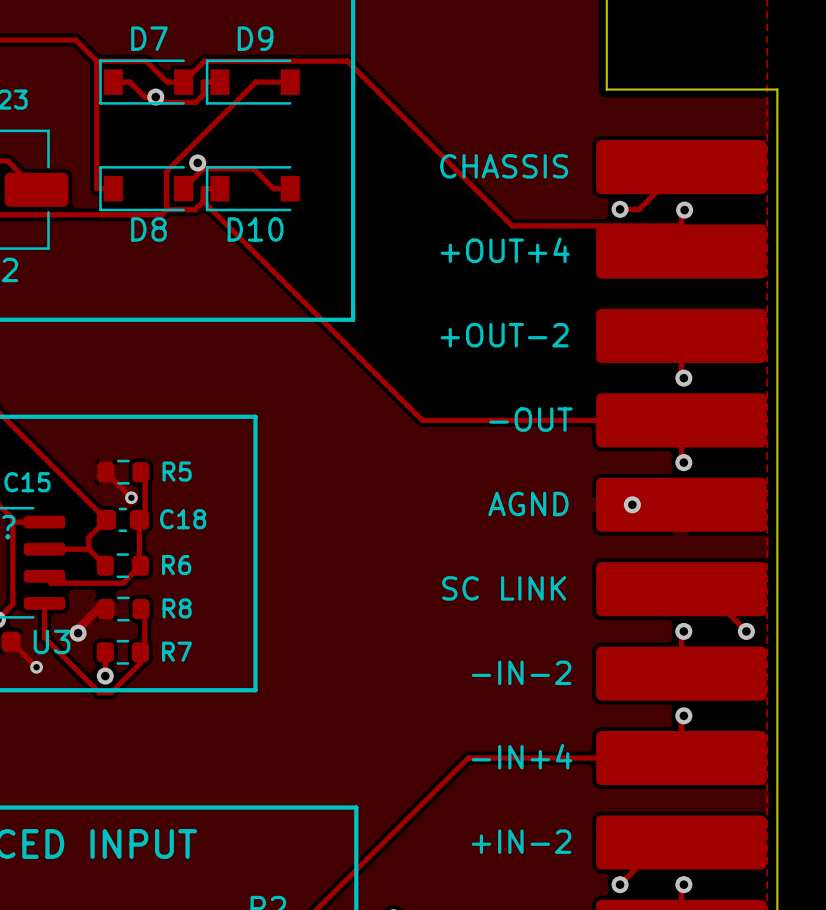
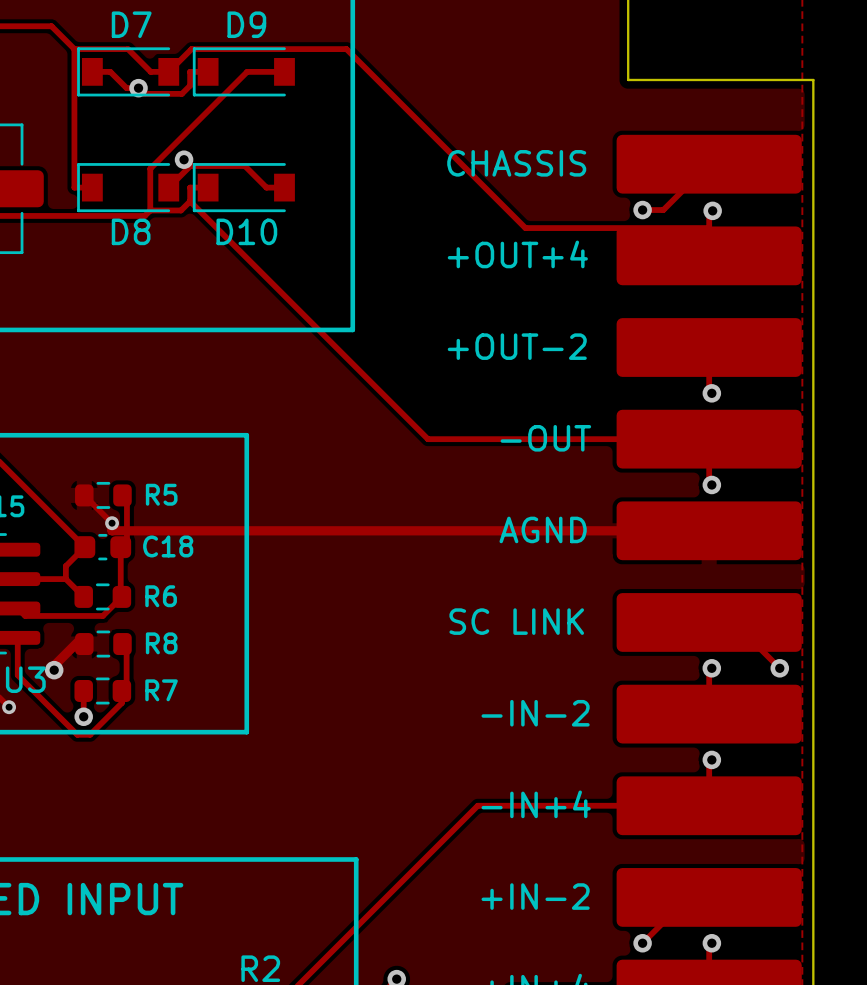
track: none -> (112, 523) (112, 530) (655, 530)
via: (632, 504) -> none

